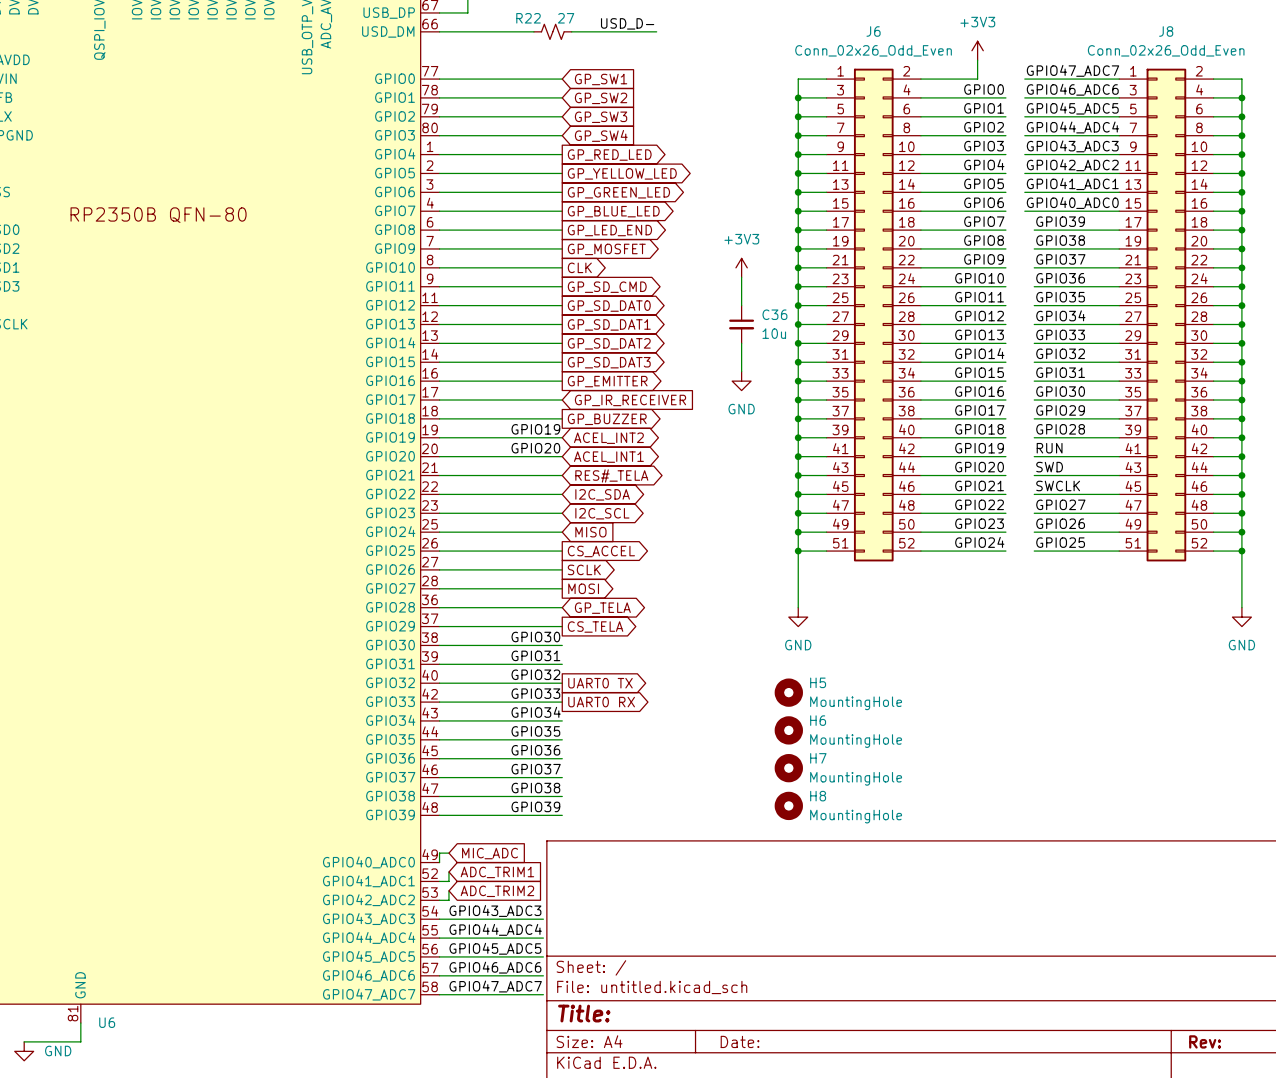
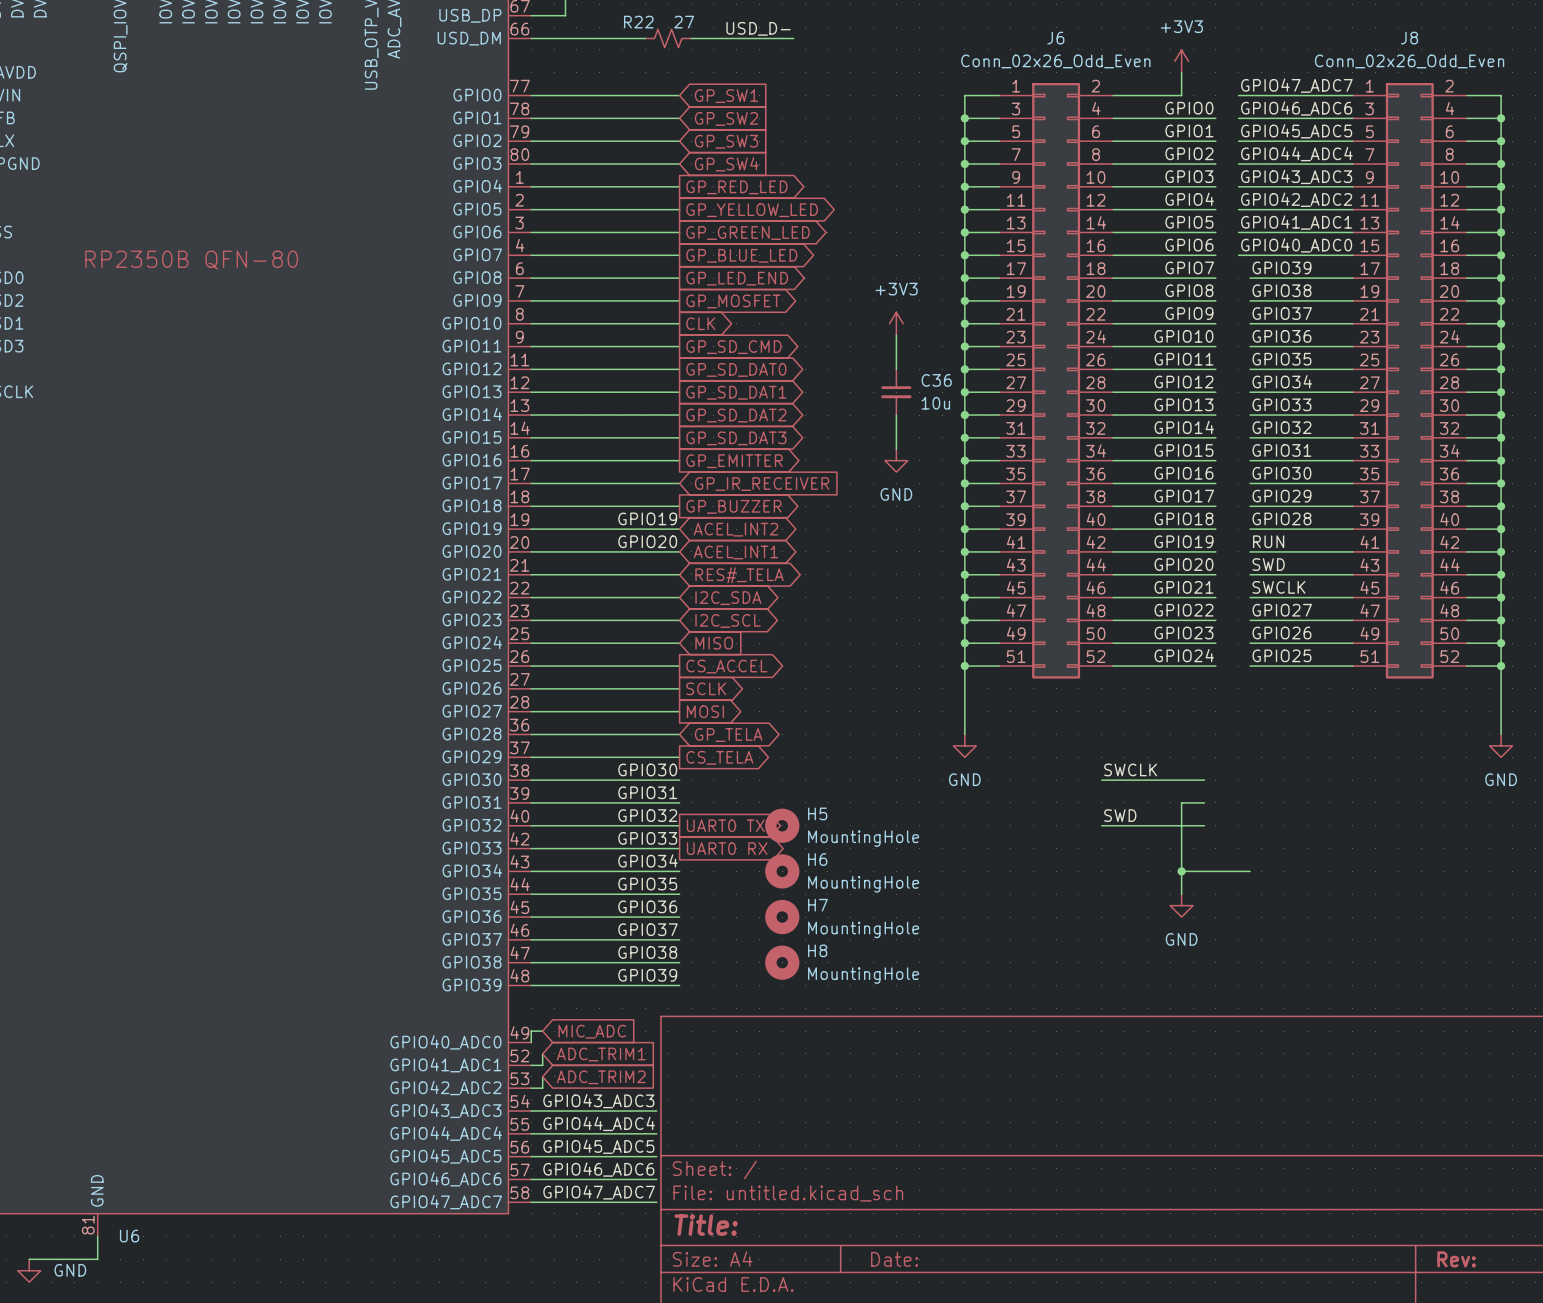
label: none -> SWCLK (1130, 769)
wire: none -> (1101, 780) (1204, 780)
wire: none -> (1204, 802) (1181, 802) (1181, 894)
label: none -> SWD (1120, 815)
wire: none -> (1101, 825) (1204, 825)
H5 position: (788, 692) -> (782, 825)
wire: none -> (1181, 871) (1250, 871)
junction: none -> (1181, 871)
H6 position: (788, 730) -> (782, 871)
power symbol: none -> GND (1181, 905)
H7 position: (788, 768) -> (782, 917)
H8 position: (788, 805) -> (782, 962)

